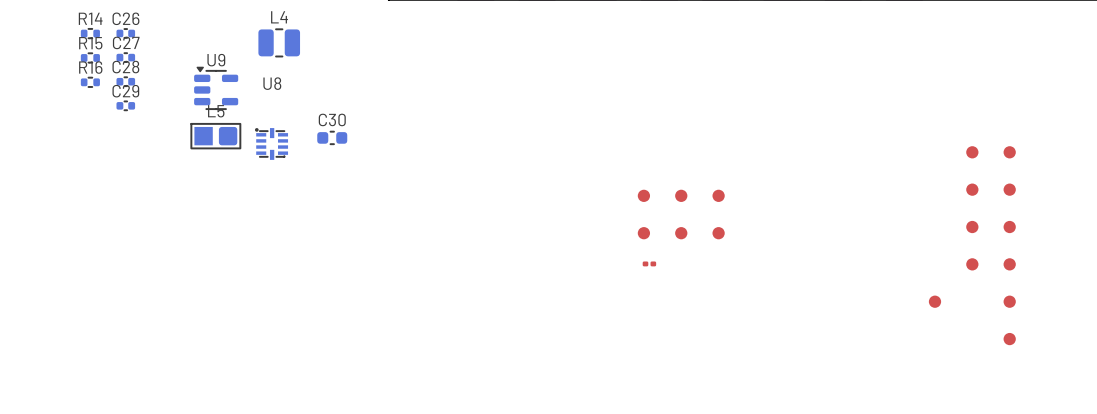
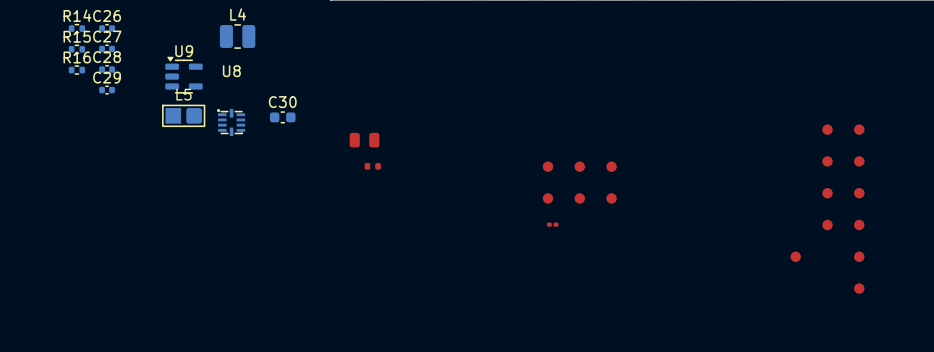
part: none -> (364, 140)
part: none -> (372, 166)

